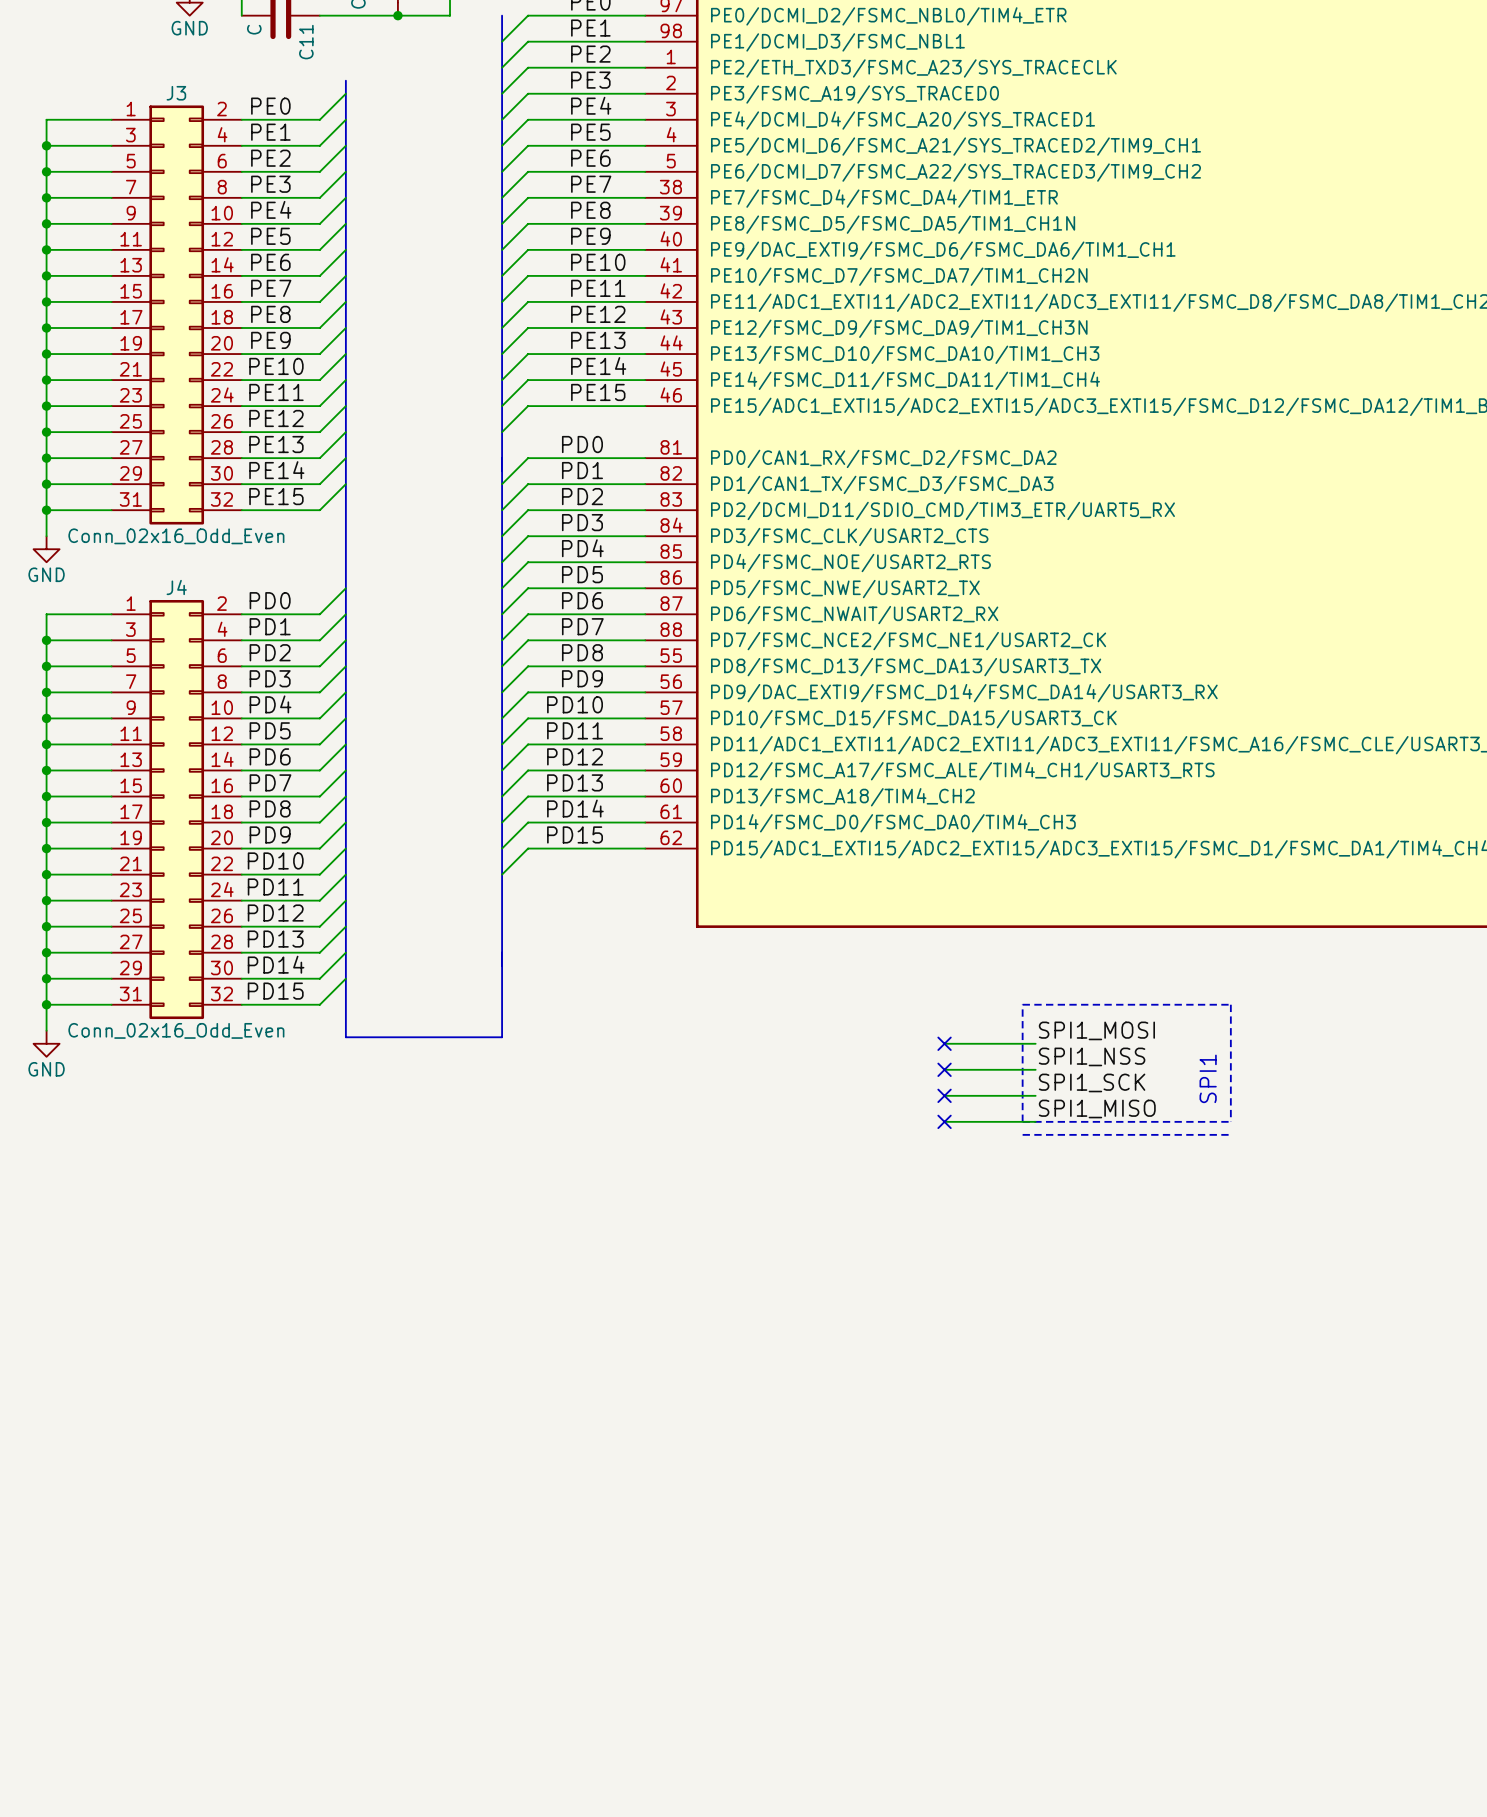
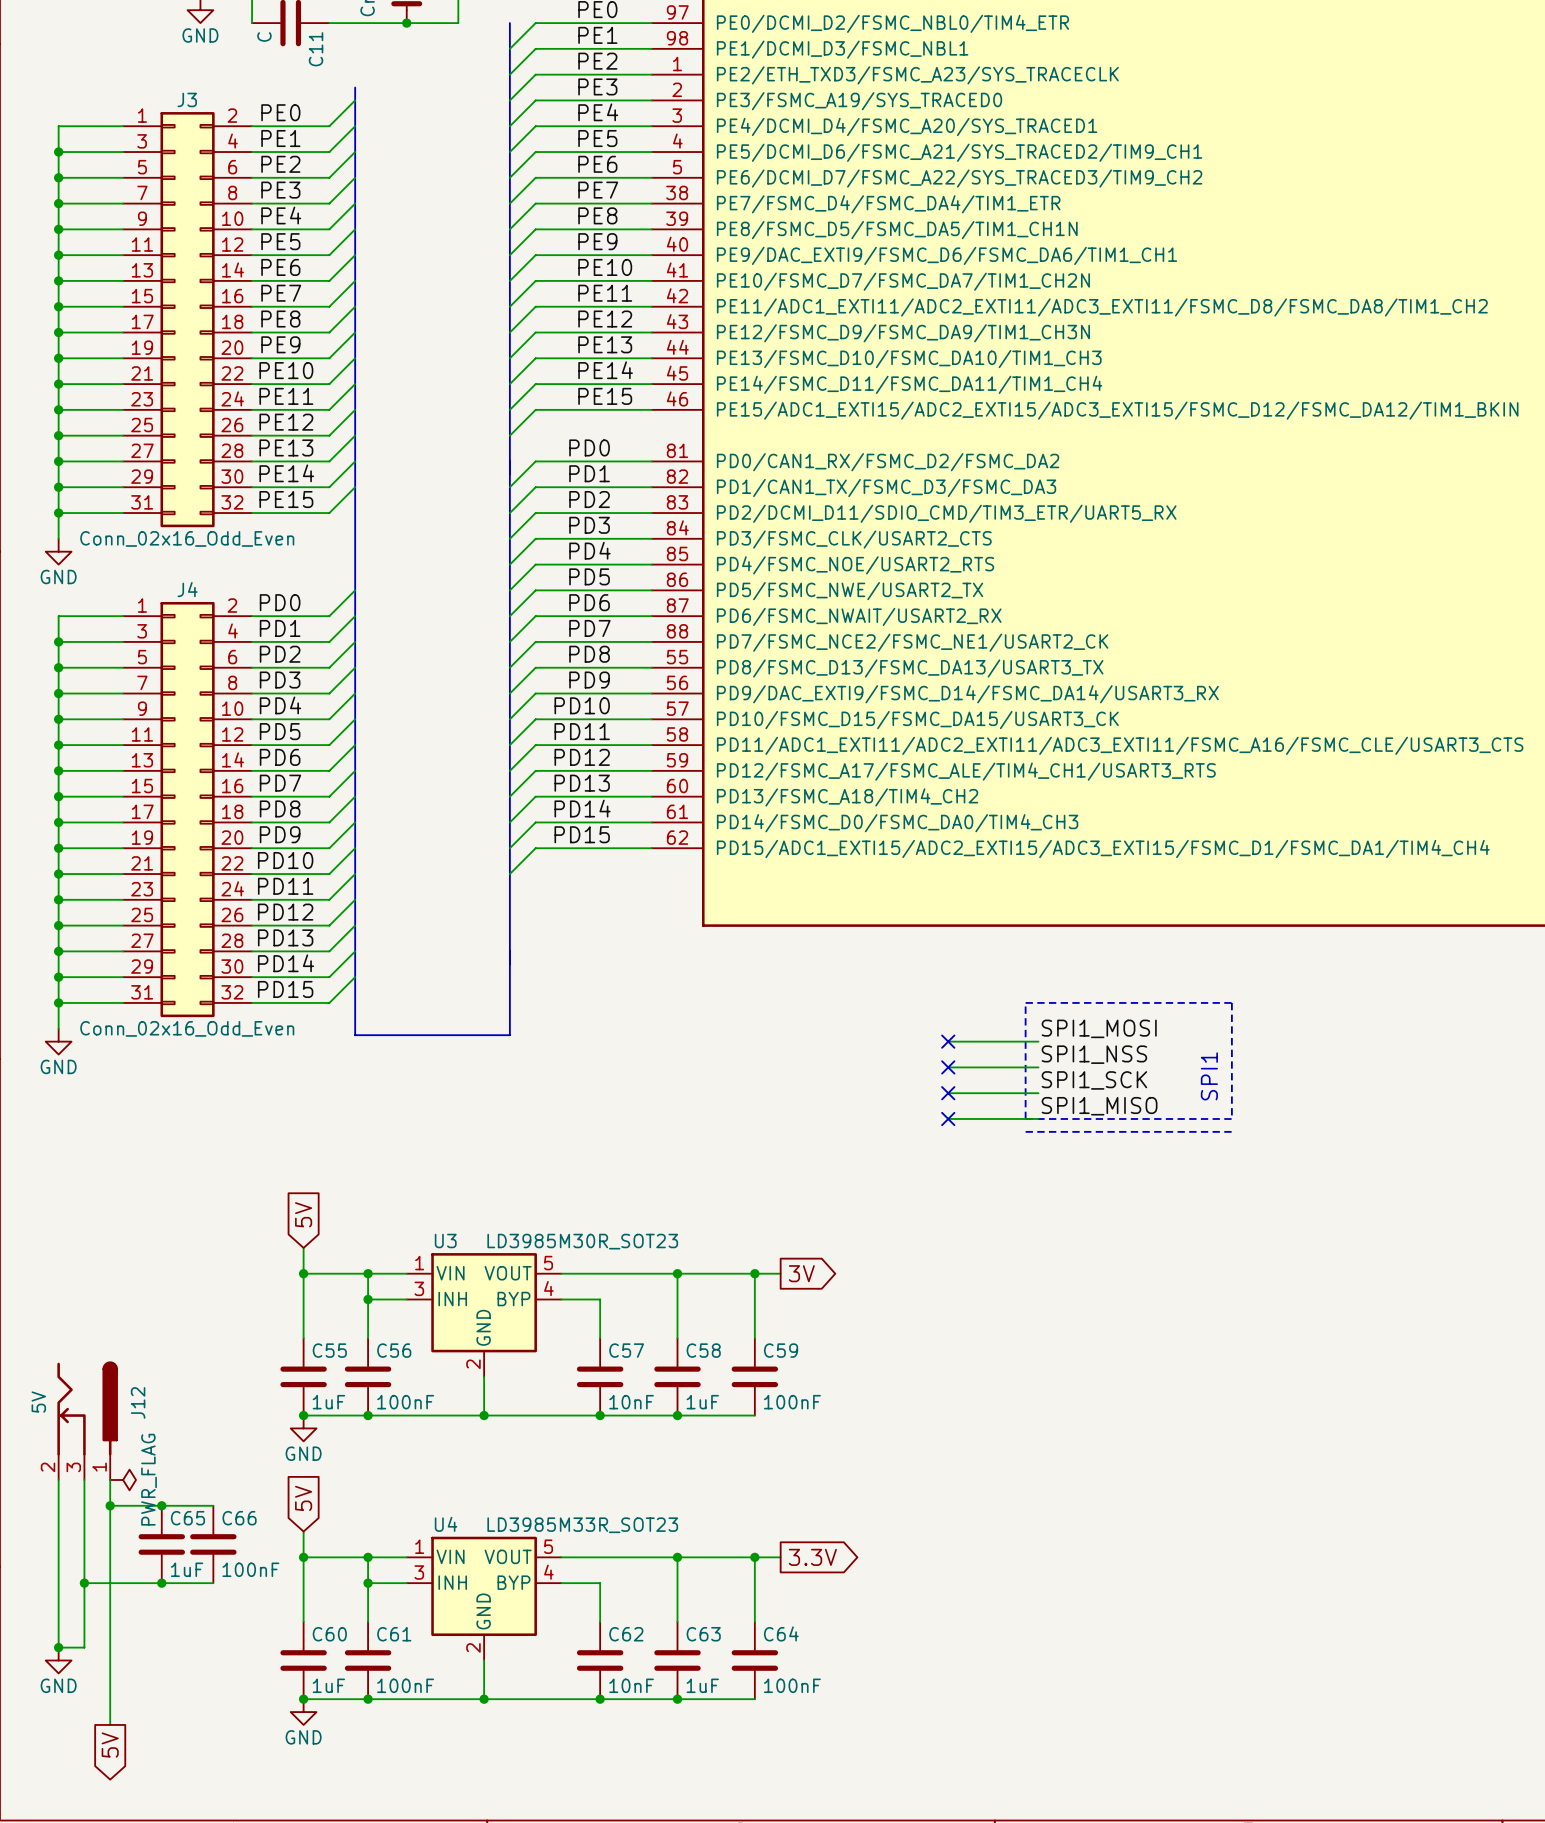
global label: none -> 5V (303, 1214)
wire: none -> (303, 1247) (303, 1338)
wire: none -> (303, 1273) (406, 1273)
junction: none -> (303, 1273)
wire: none -> (368, 1273) (368, 1338)
junction: none -> (368, 1273)
wire: none -> (561, 1273) (780, 1273)
wire: none -> (677, 1273) (677, 1338)
junction: none -> (677, 1273)
wire: none -> (754, 1273) (754, 1338)
junction: none -> (754, 1273)
global label: none -> 3V (801, 1273)
wire: none -> (368, 1299) (406, 1299)
junction: none -> (368, 1299)
wire: none -> (561, 1299) (600, 1299) (600, 1338)
U3: none -> LD3985M30R_SOT23 (484, 1314)
C55: none -> 1uF (303, 1376)
C56: none -> 100nF (368, 1376)
wire: none -> (484, 1376) (484, 1415)
C57: none -> 10nF (600, 1376)
C58: none -> 1uF (677, 1376)
C59: none -> 100nF (754, 1376)
wire: none -> (303, 1415) (754, 1415)
junction: none -> (303, 1415)
junction: none -> (368, 1415)
junction: none -> (484, 1415)
junction: none -> (600, 1415)
junction: none -> (677, 1415)
J12: none -> 5V (87, 1420)
power symbol: none -> GND (303, 1428)
wire: none -> (58, 1480) (58, 1647) (84, 1647) (84, 1480)
wire: none -> (110, 1480) (110, 1724)
power symbol: none -> PWR_FLAG (123, 1480)
global label: none -> 5V (303, 1498)
wire: none -> (110, 1505) (213, 1505)
junction: none -> (110, 1505)
junction: none -> (161, 1505)
wire: none -> (303, 1531) (303, 1621)
C65: none -> 1uF (161, 1544)
C66: none -> 100nF (213, 1544)
wire: none -> (303, 1557) (406, 1557)
junction: none -> (303, 1557)
wire: none -> (368, 1557) (368, 1621)
junction: none -> (368, 1557)
wire: none -> (561, 1557) (780, 1557)
wire: none -> (677, 1557) (677, 1621)
junction: none -> (677, 1557)
wire: none -> (754, 1557) (754, 1621)
junction: none -> (754, 1557)
global label: none -> 3.3V (812, 1557)
wire: none -> (84, 1583) (213, 1583)
junction: none -> (84, 1583)
junction: none -> (161, 1583)
wire: none -> (368, 1583) (406, 1583)
junction: none -> (368, 1583)
wire: none -> (561, 1583) (600, 1583) (600, 1621)
U4: none -> LD3985M33R_SOT23 (484, 1598)
junction: none -> (58, 1647)
power symbol: none -> GND (58, 1660)
C60: none -> 1uF (303, 1660)
C61: none -> 100nF (368, 1660)
wire: none -> (484, 1660) (484, 1699)
C62: none -> 10nF (600, 1660)
C63: none -> 1uF (677, 1660)
C64: none -> 100nF (754, 1660)
wire: none -> (303, 1699) (754, 1699)
junction: none -> (303, 1699)
junction: none -> (368, 1699)
junction: none -> (484, 1699)
junction: none -> (600, 1699)
junction: none -> (677, 1699)
power symbol: none -> GND (303, 1712)
global label: none -> 5V (110, 1745)

